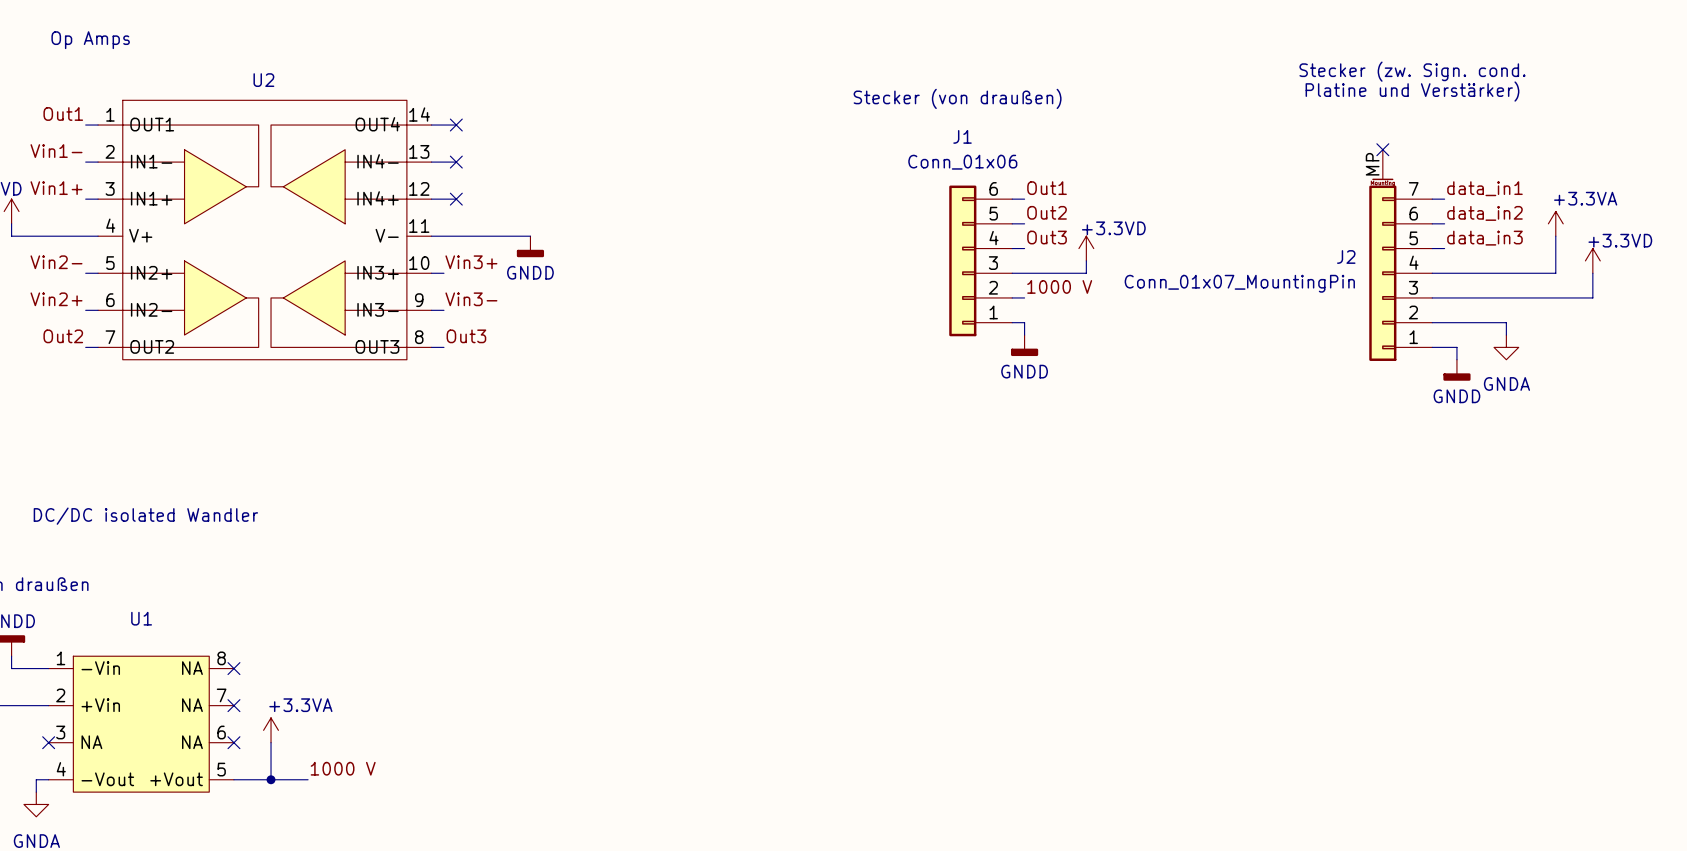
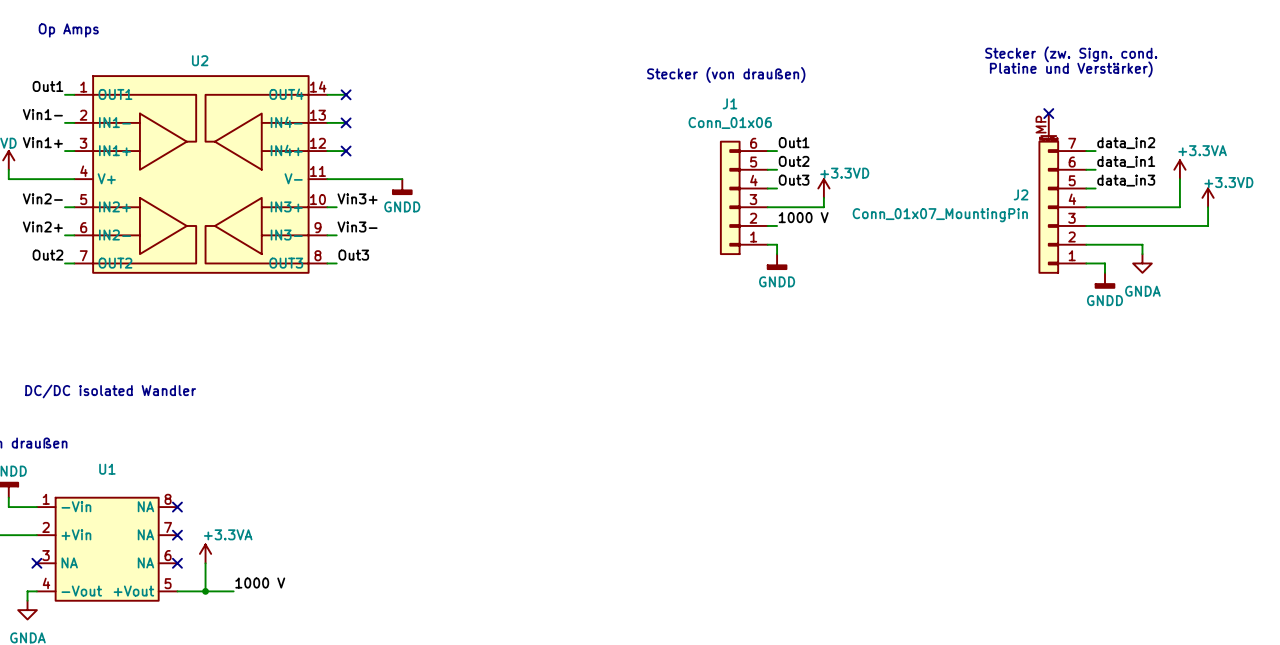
U2 symbol: [98, 100, 432, 360] -> [74, 76, 328, 273]
label: data_in1 (1484, 188) -> data_in2 (1126, 143)
label: data_in2 (1484, 213) -> data_in1 (1126, 161)

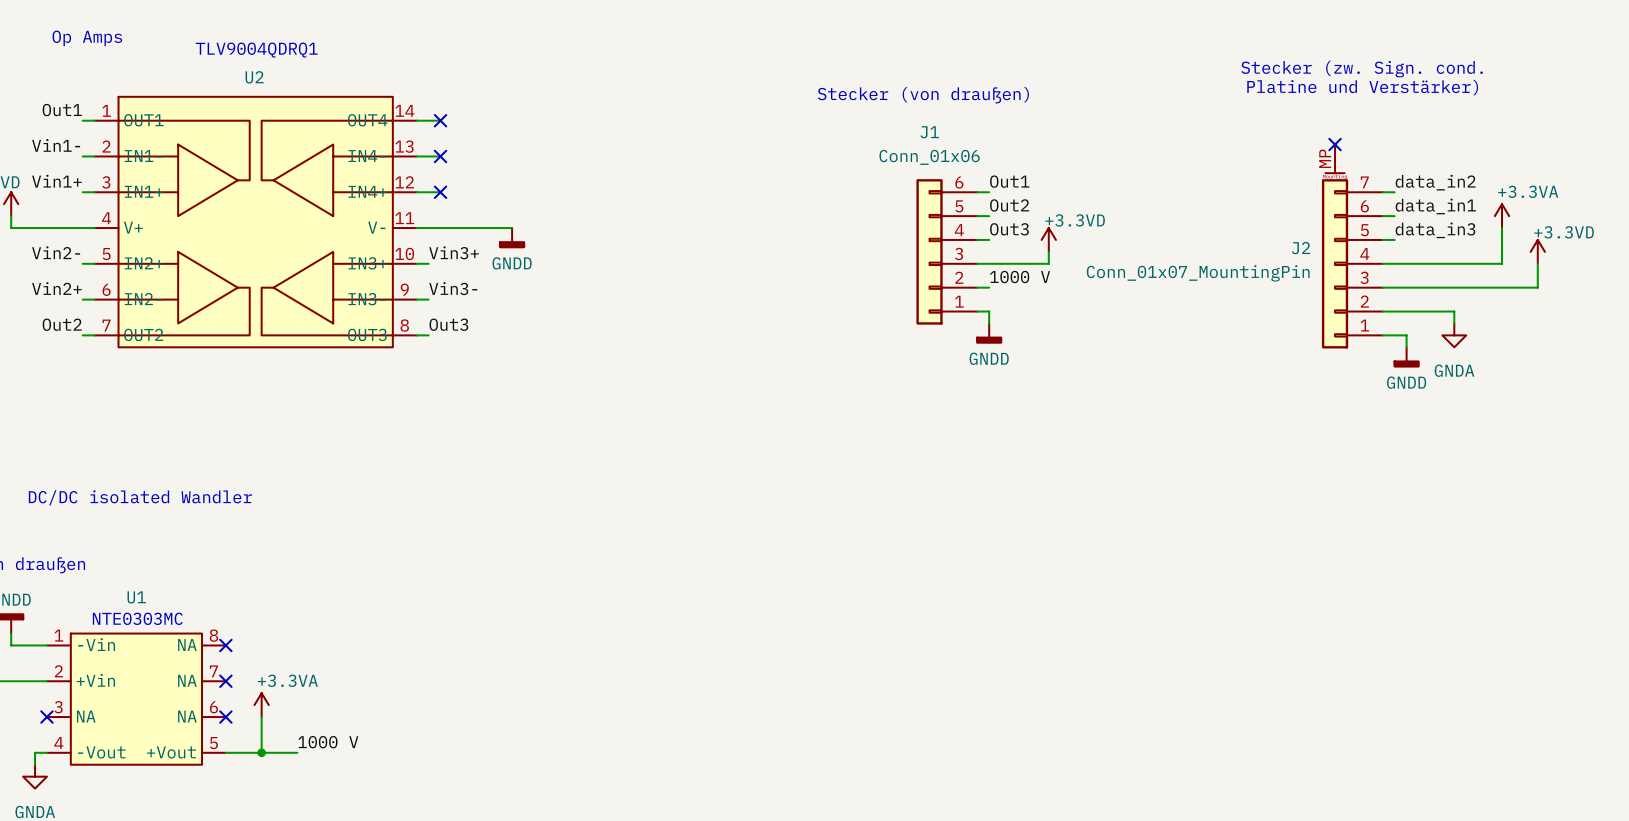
text: none -> TLV9004QDRQ1 (256, 50)
text: none -> NTE0303MC (137, 618)

